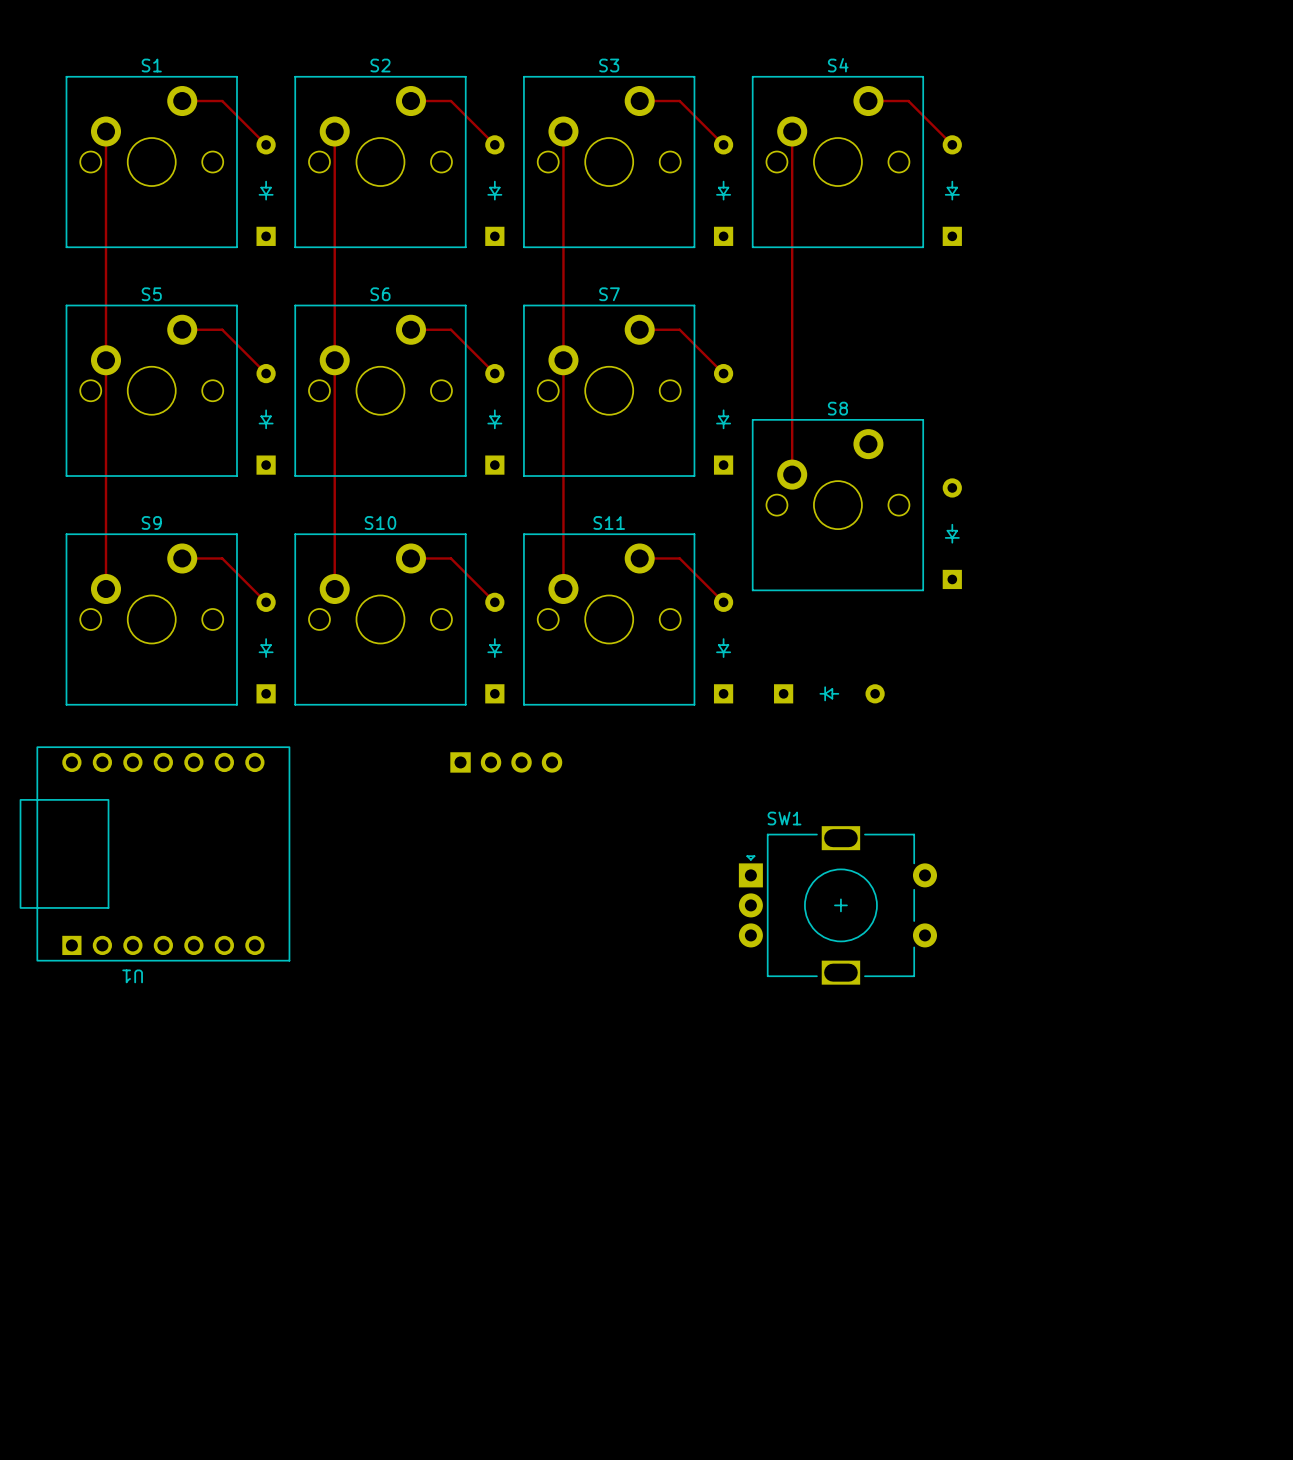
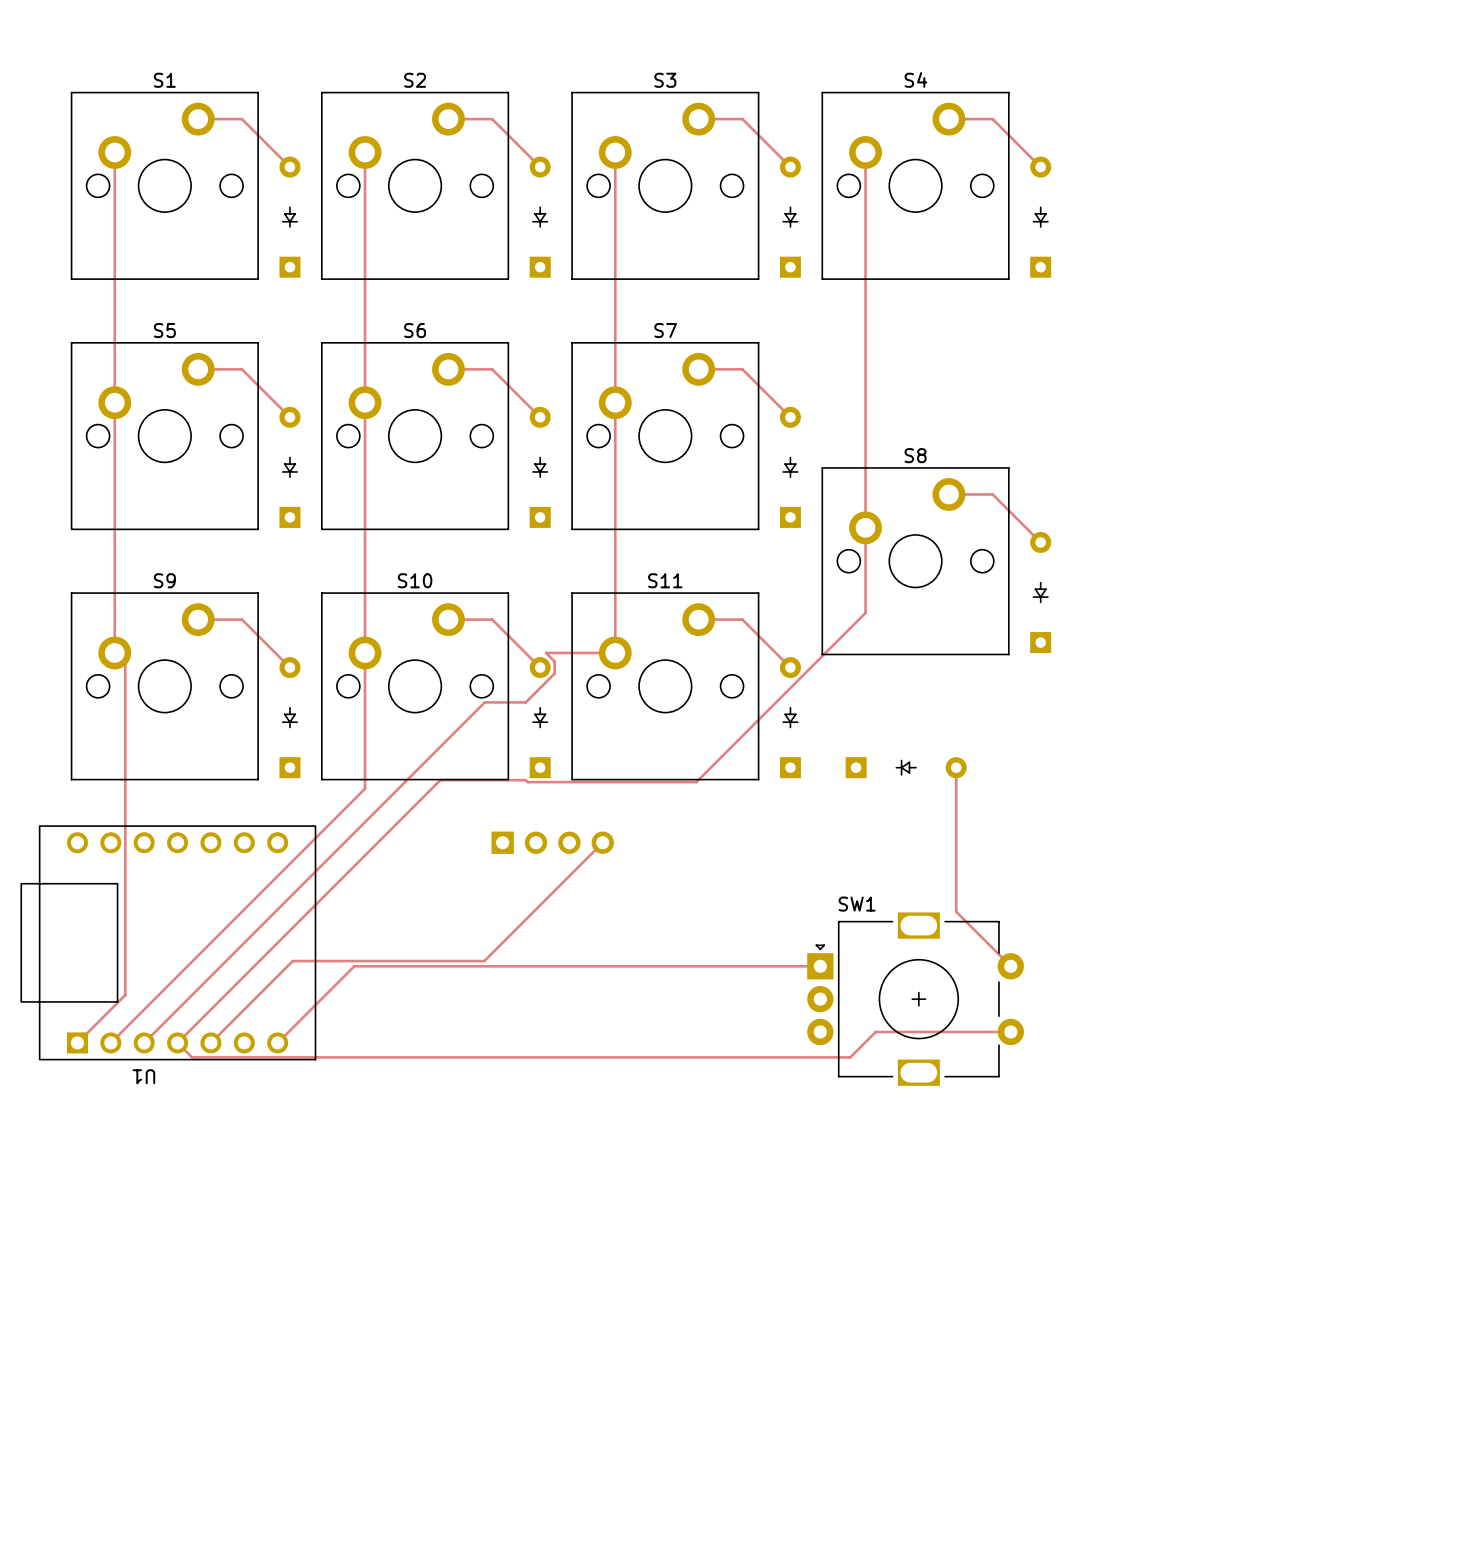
track: none -> (948, 494) (992, 494) (1040, 542)
track: none -> (865, 527) (865, 612) (696, 782) (440, 780) (177, 1042) (192, 1057) (850, 1057) (875, 1031) (1010, 1031)
track: none -> (114, 652) (125, 663) (125, 995) (77, 1042)
track: none -> (365, 652) (365, 788) (110, 1042)
track: none -> (615, 652) (546, 652) (554, 661) (554, 673) (525, 702) (484, 702) (144, 1042)
track: none -> (956, 767) (956, 911) (1010, 966)
track: none -> (602, 842) (484, 961) (292, 961) (210, 1042)
track: none -> (820, 966) (354, 966) (277, 1042)

